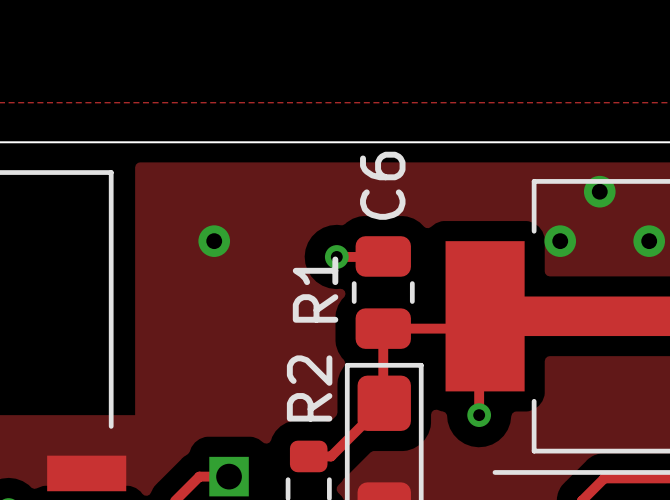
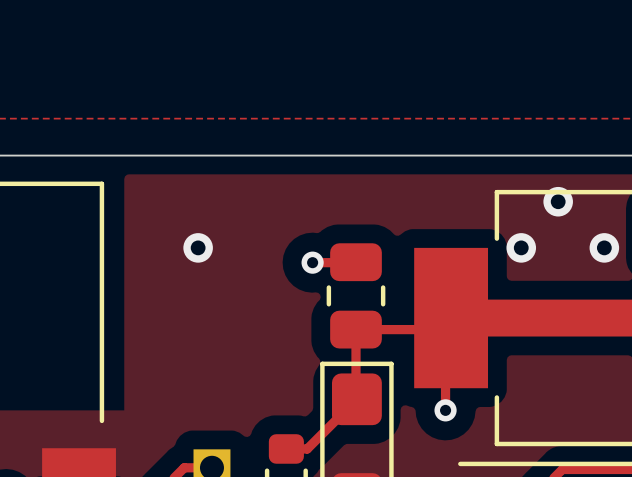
C6 name: C6 (382, 185) -> none
R1 name: R1 (315, 289) -> none
R2 name: R2 (309, 388) -> none

